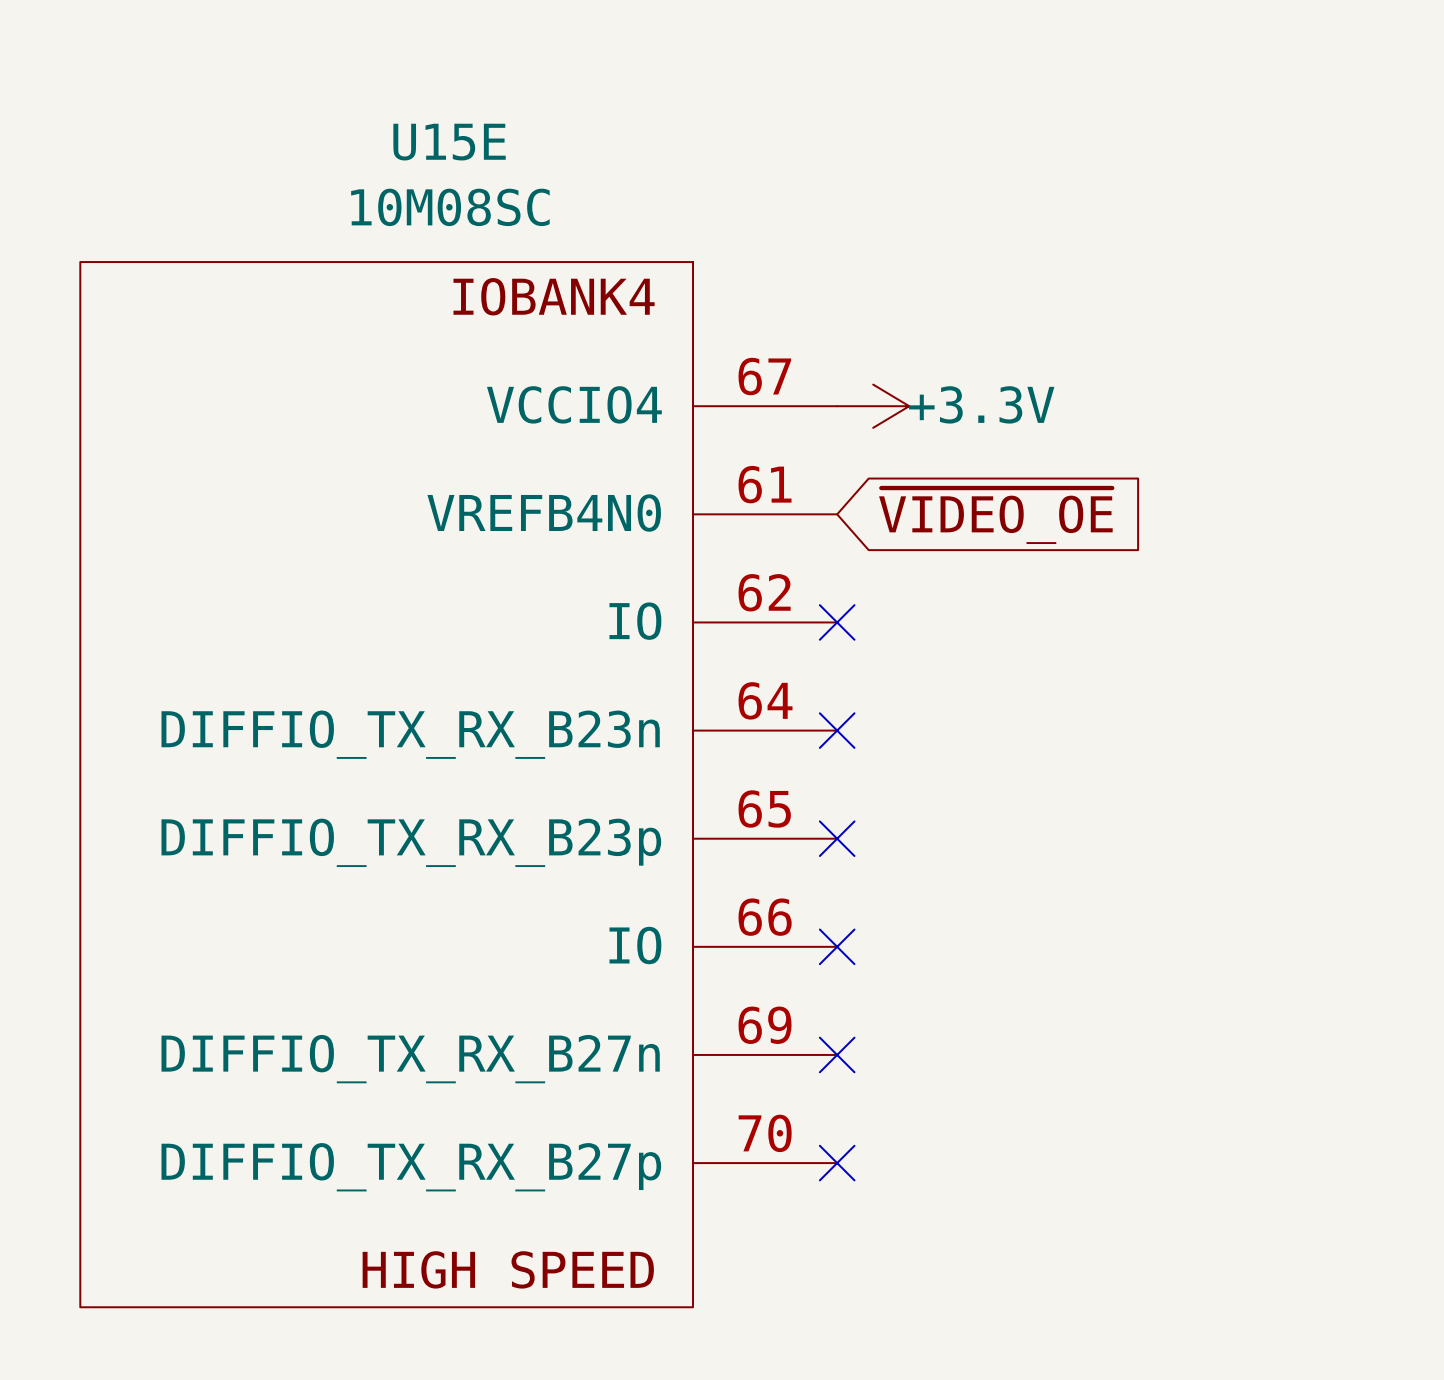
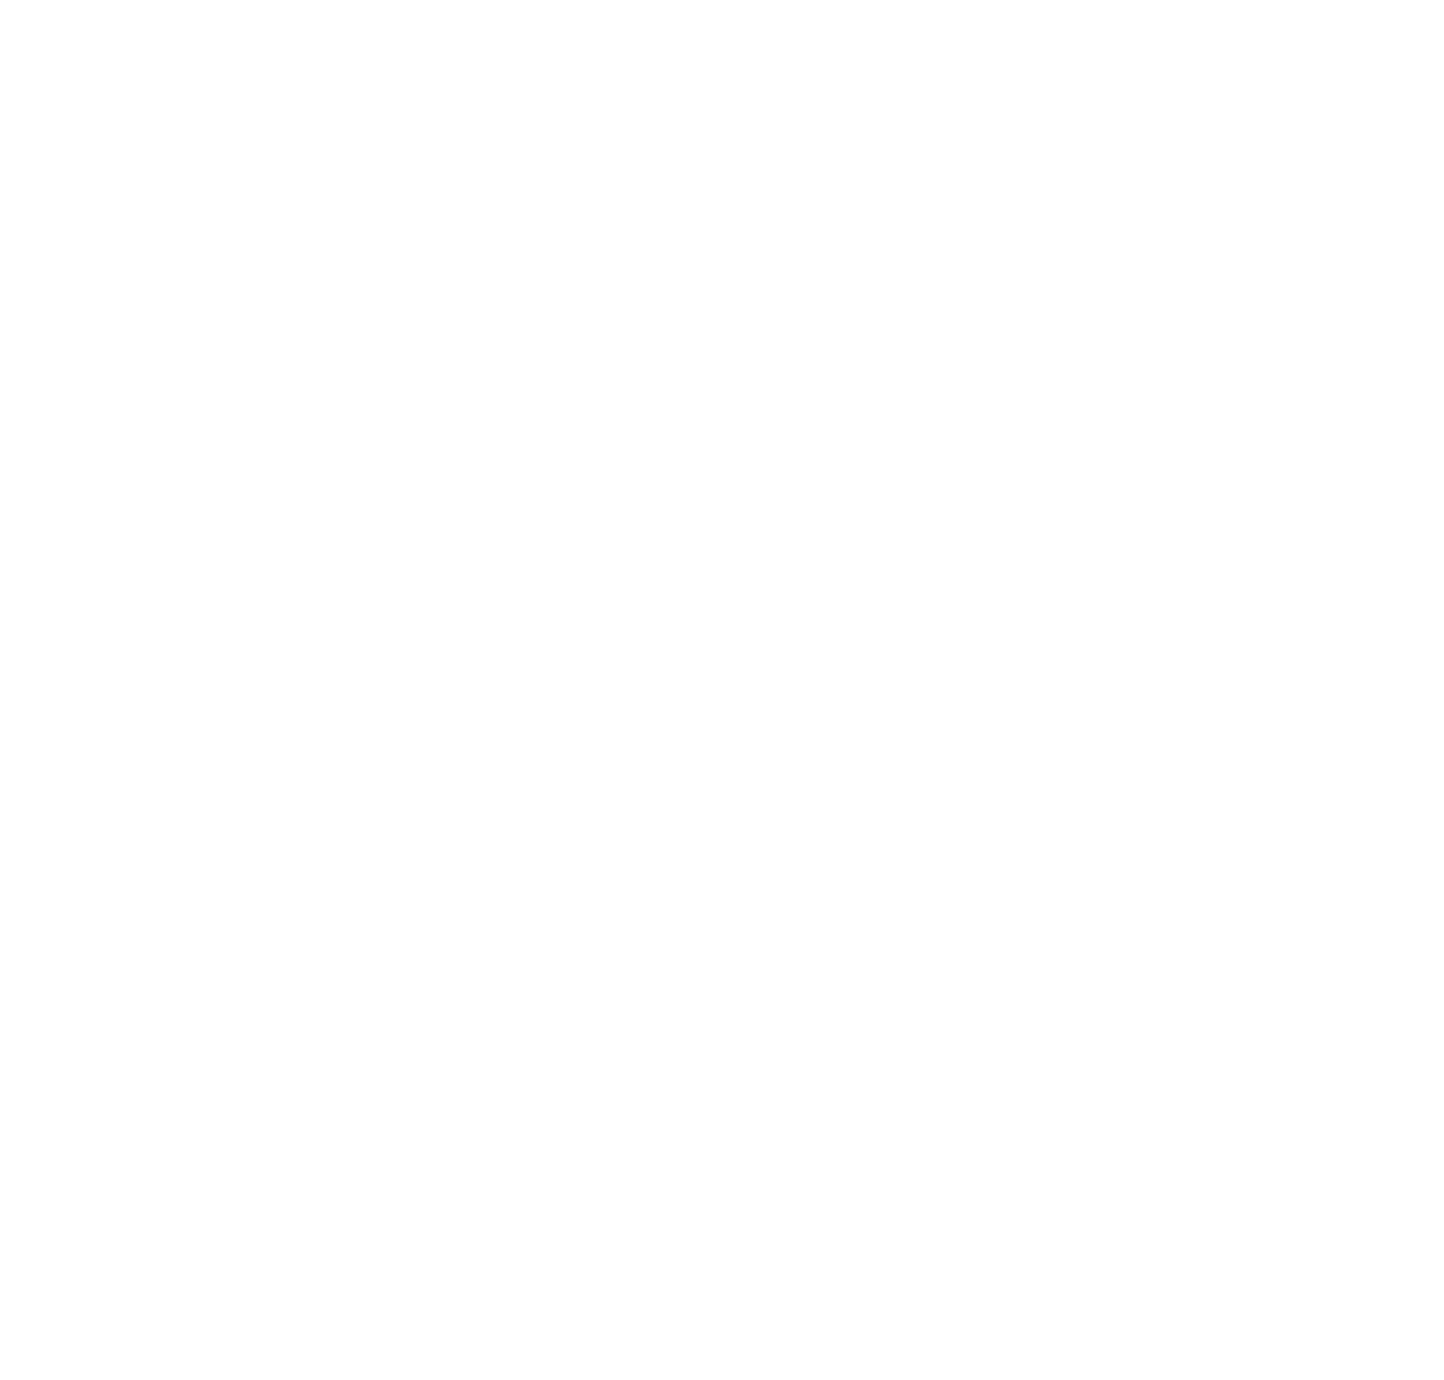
power symbol: +3.3V (873, 406) -> none
global label: ~{VIDEO_OE} (995, 516) -> none
no-connect mark: (837, 622) -> none
no-connect mark: (837, 730) -> none
U15E: 10M08SC (458, 784) -> none
no-connect mark: (837, 838) -> none
no-connect mark: (837, 946) -> none
no-connect mark: (837, 1054) -> none
no-connect mark: (837, 1163) -> none

